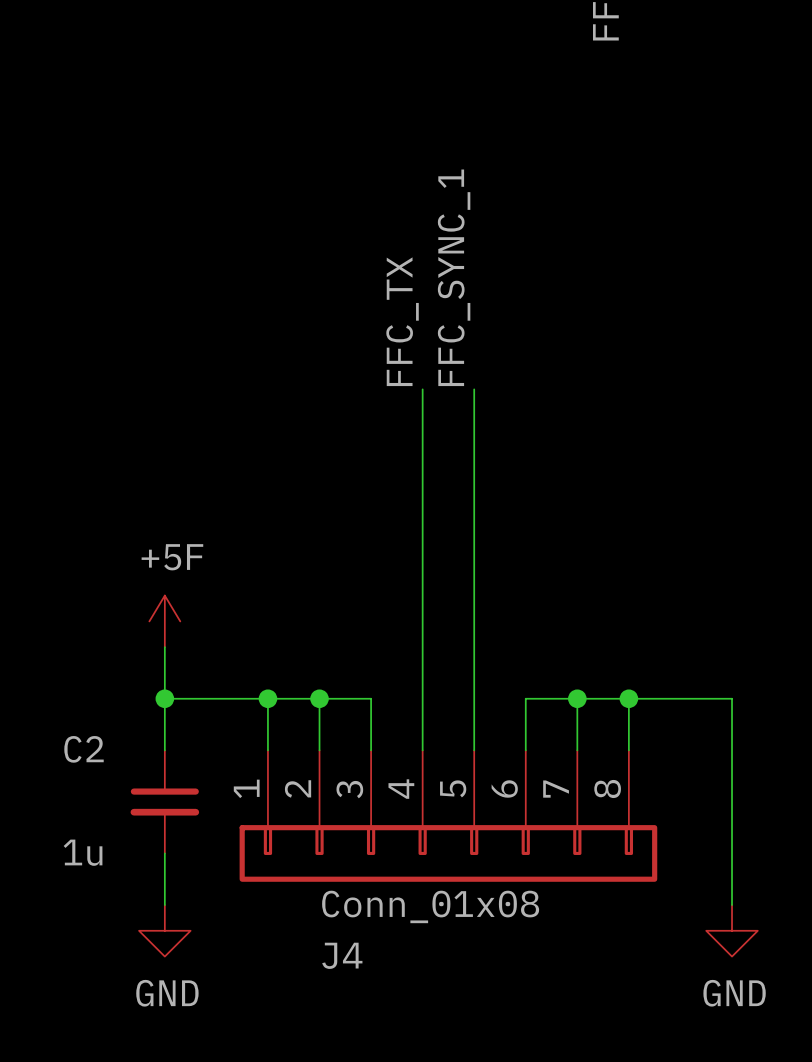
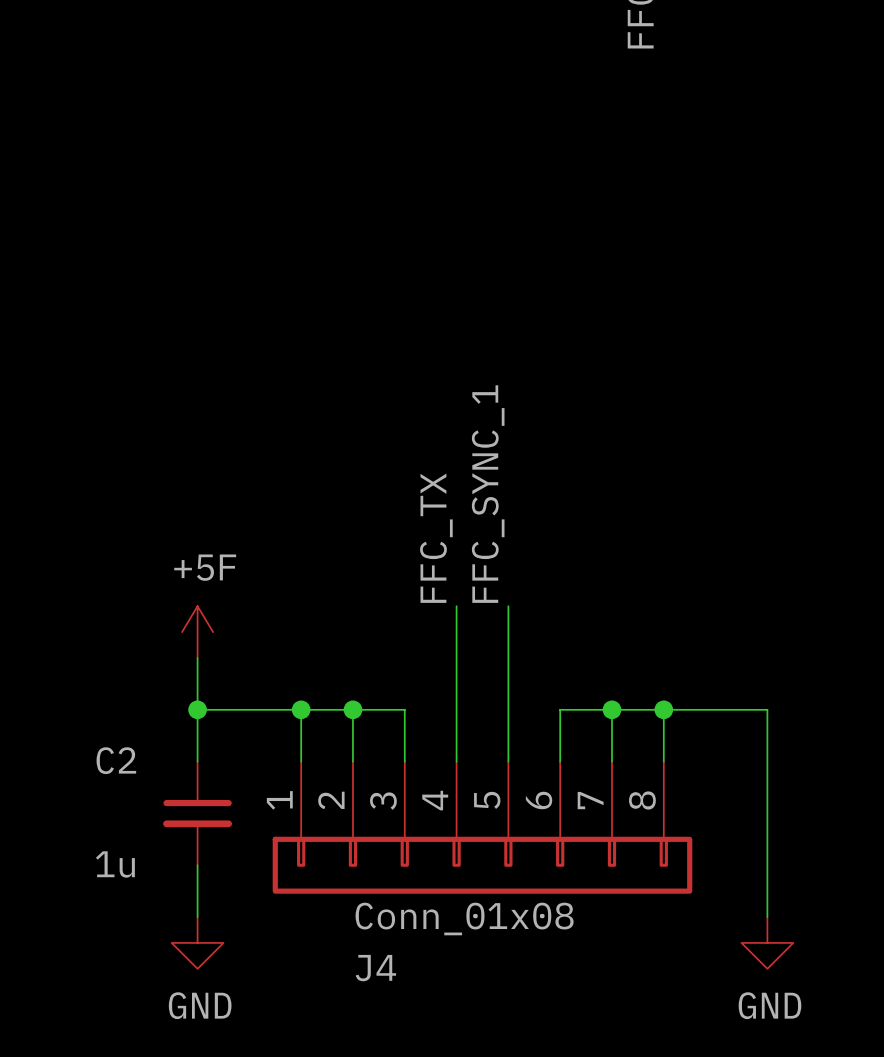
label position: FFC_SYNC_1 (454, 277) -> FFC_SYNC_1 (488, 494)
label position: FFC_TX (402, 321) -> FFC_TX (436, 538)
wire: (422, 389) (422, 595) -> none
wire: (474, 389) (474, 595) -> none

